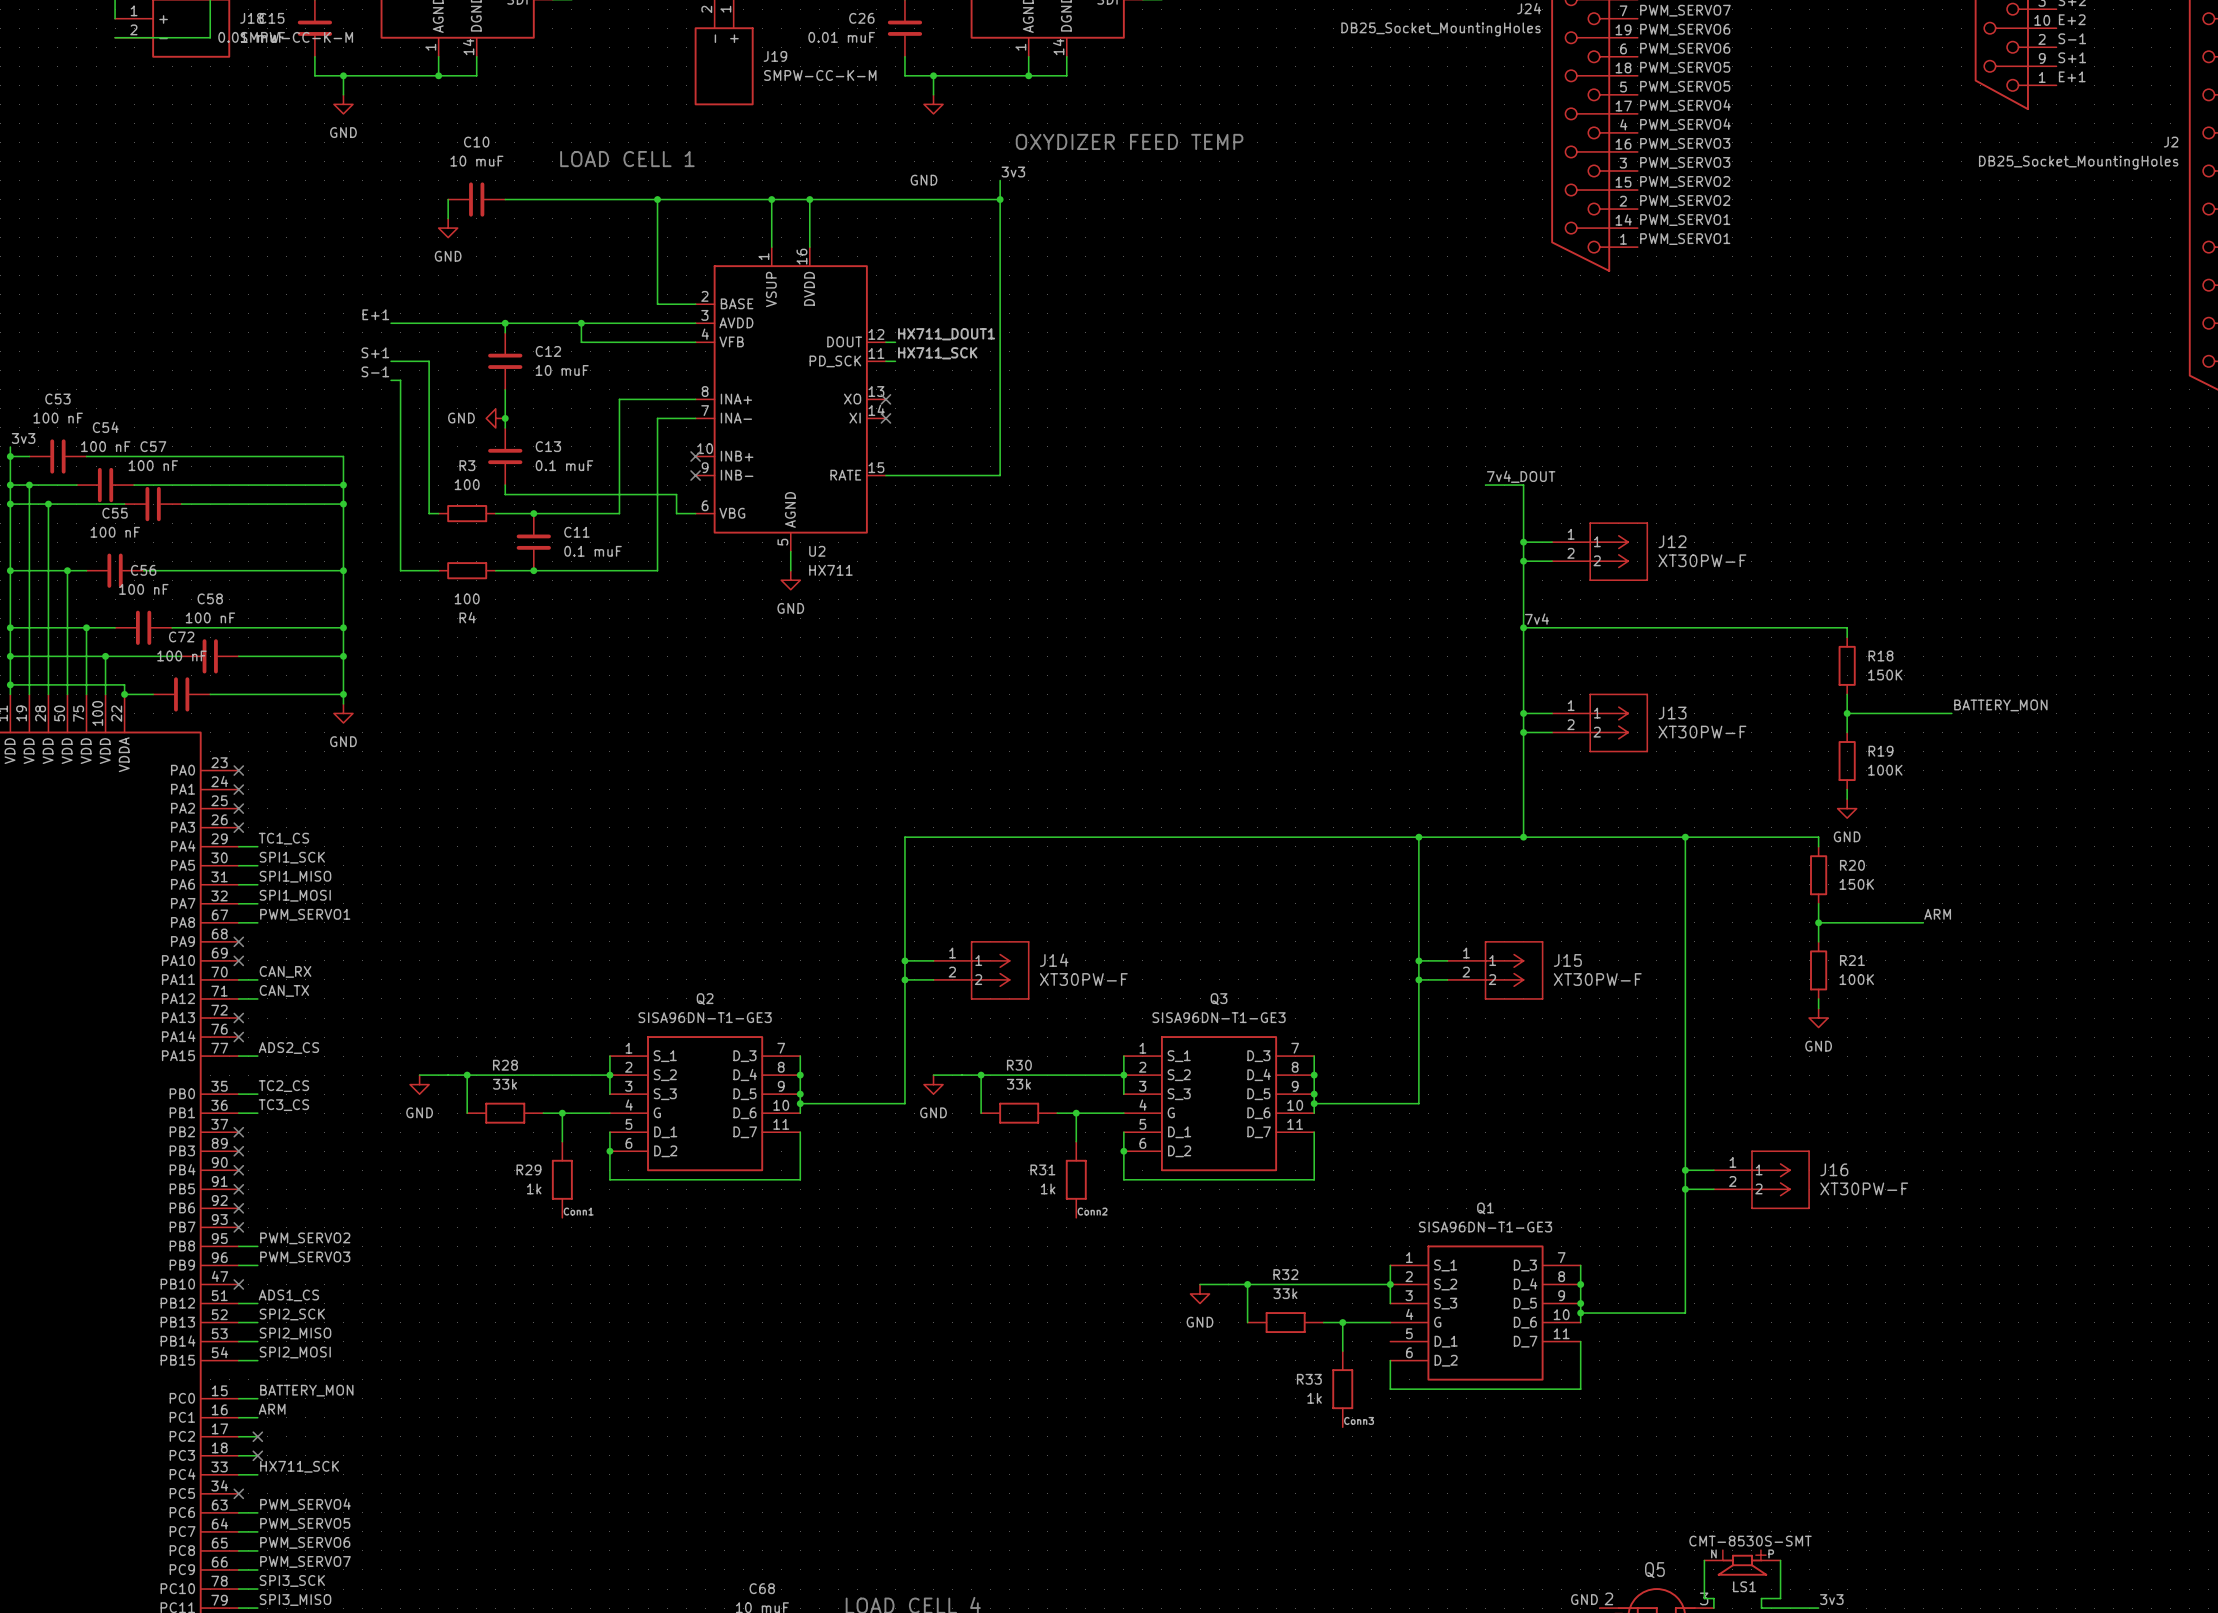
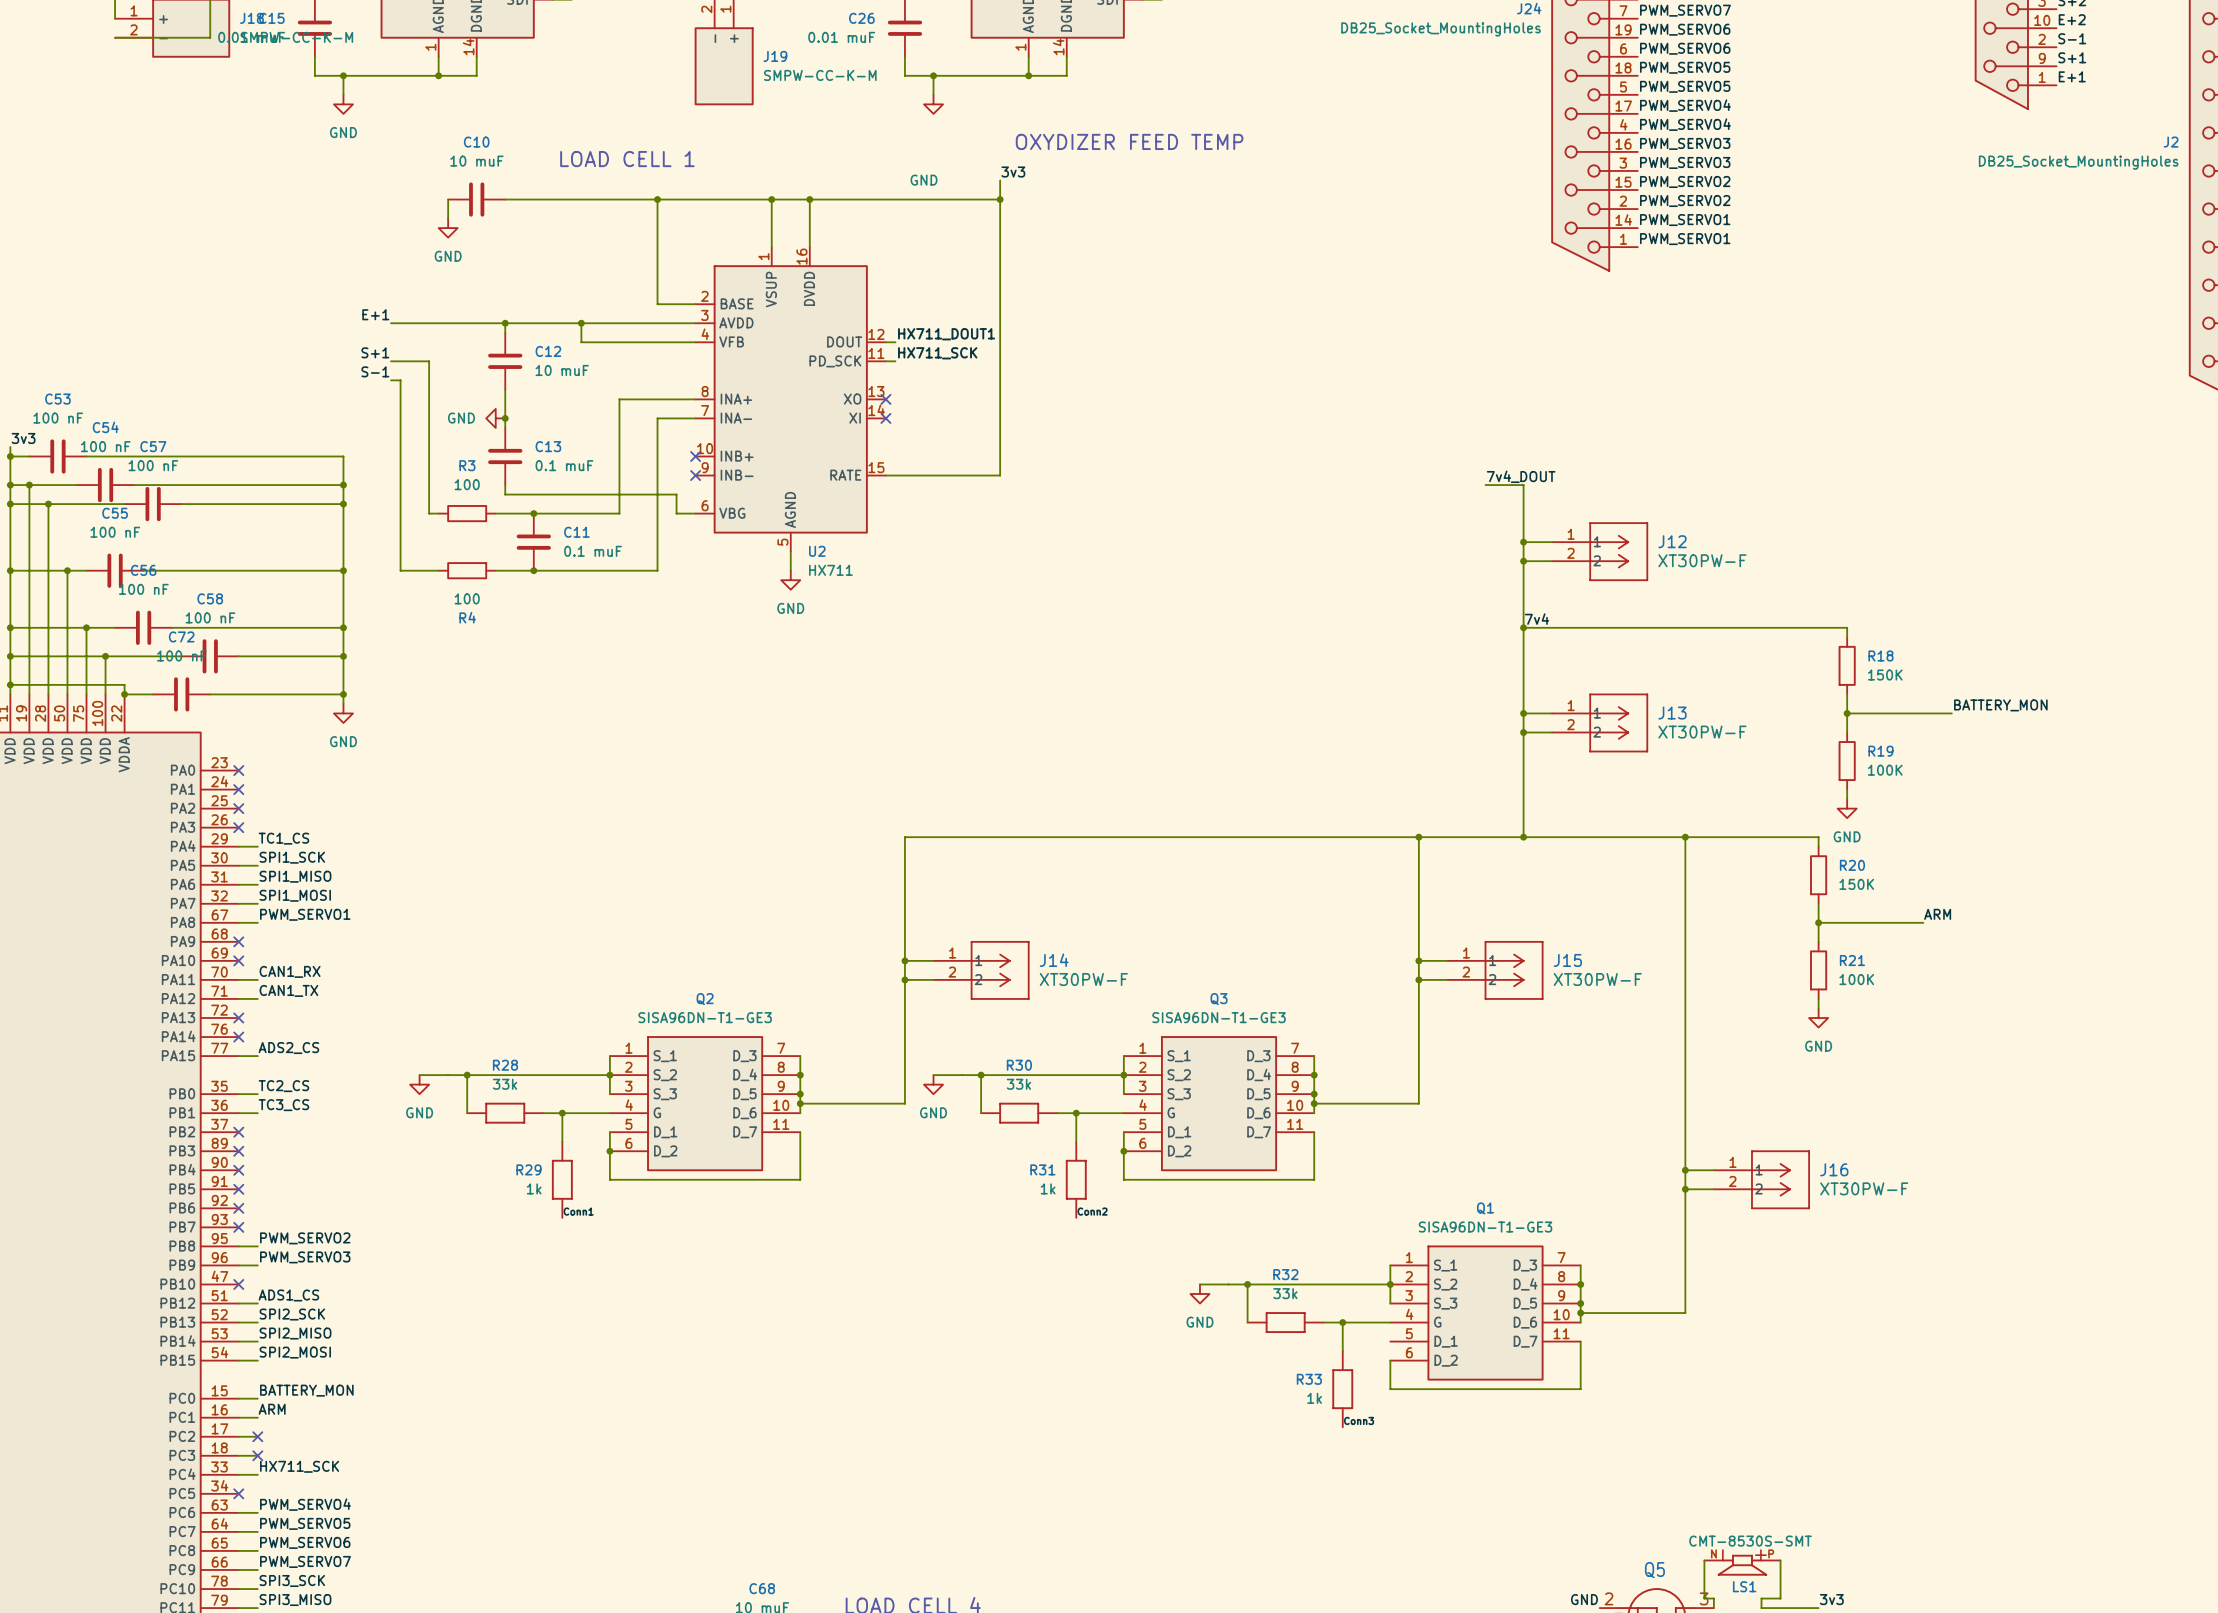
label: CAN_RX (285, 971) -> CAN1_RX (290, 971)
label: CAN_TX (284, 990) -> CAN1_TX (288, 990)

